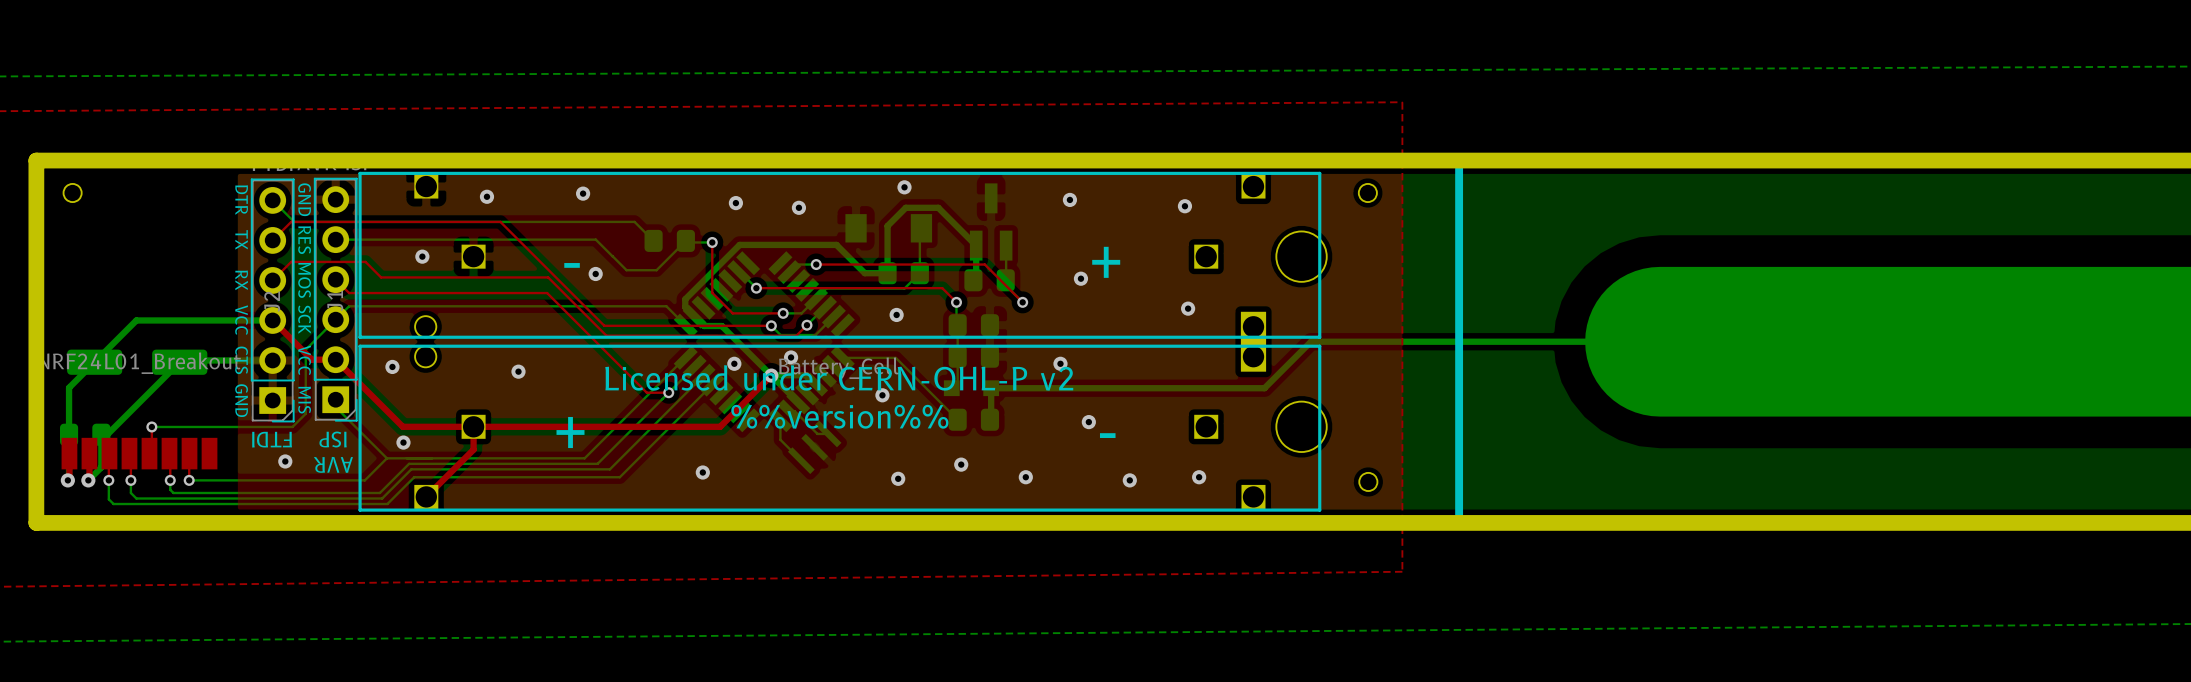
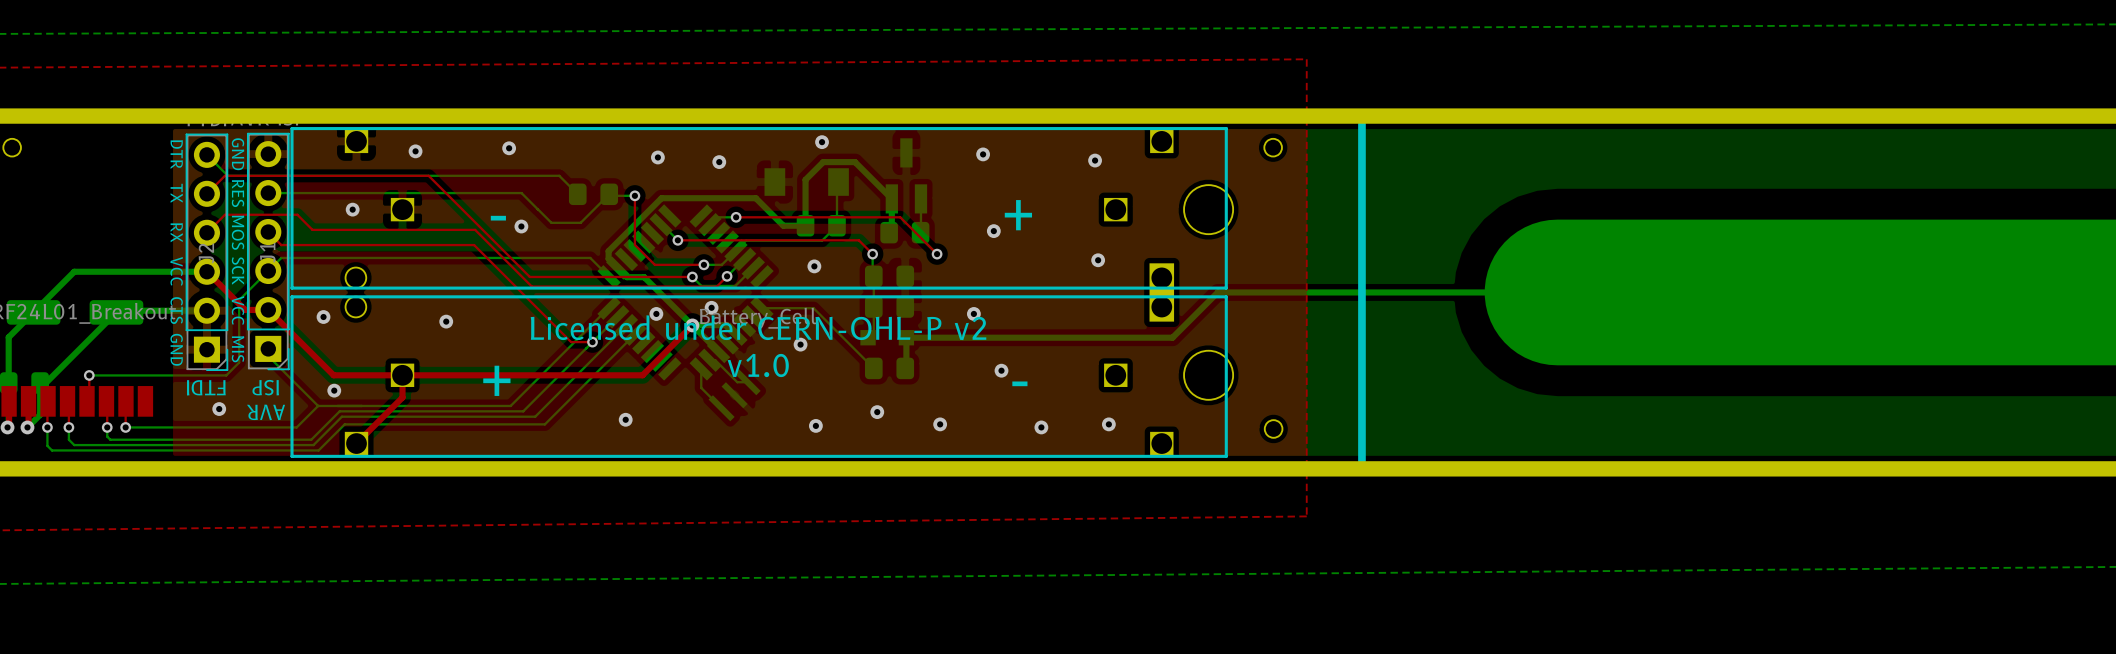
text: %%version%% (839, 416) -> v1.0 (758, 365)

